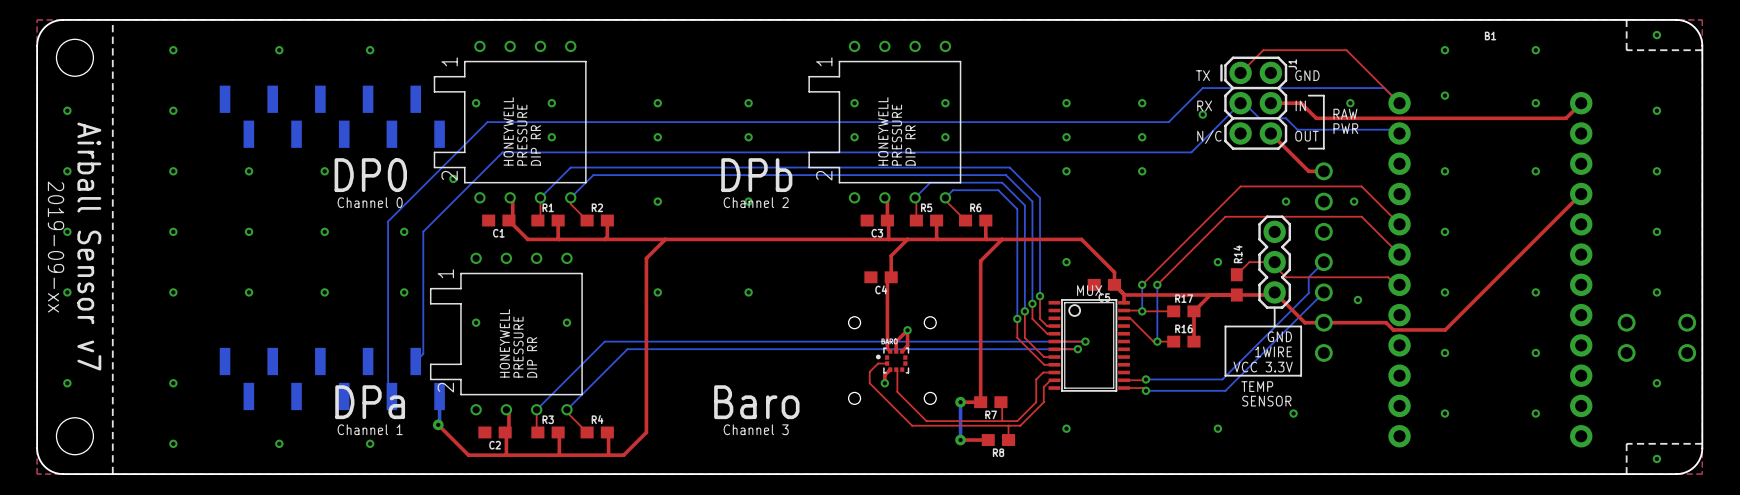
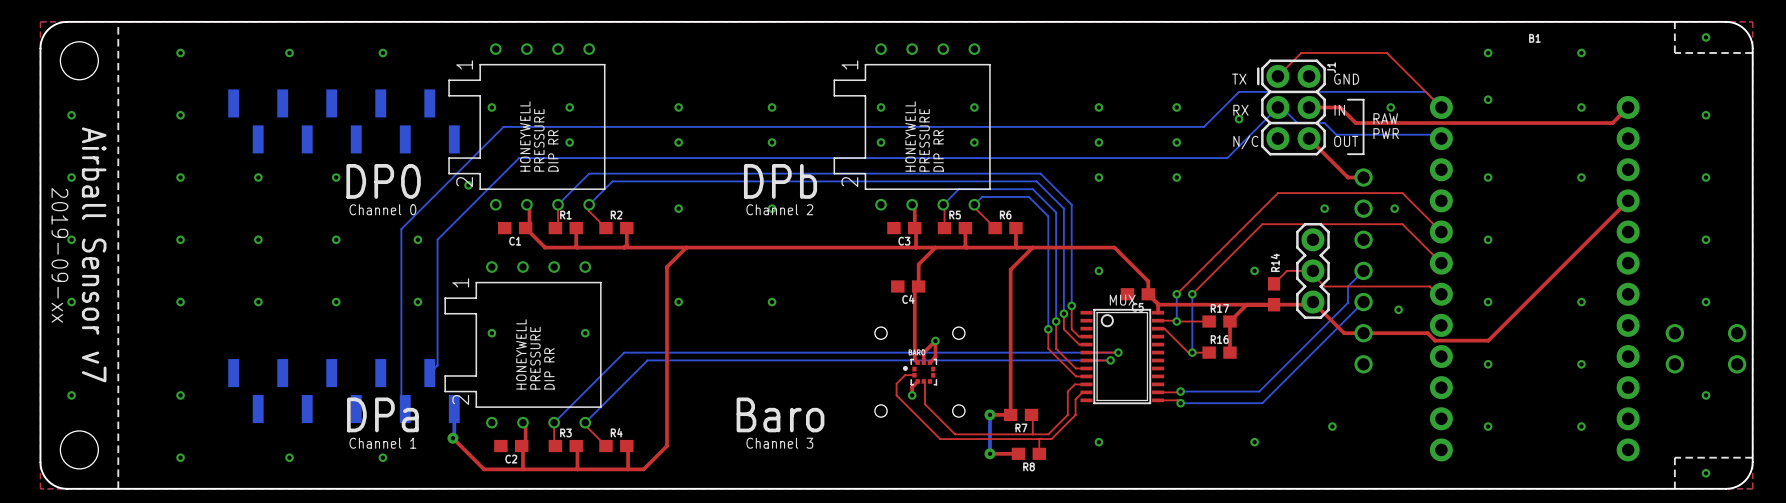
line: (1274, 307) (1274, 326) -> none
line: (1225, 326) (1301, 326) (1301, 375) (1225, 375) (1225, 326) -> none
text: GND (1279, 336) -> none
text: 1WIRE (1273, 351) -> none
text: VCC 3.3V (1263, 367) -> none
text: TEMP (1257, 386) -> none
text: SENSOR (1266, 401) -> none

